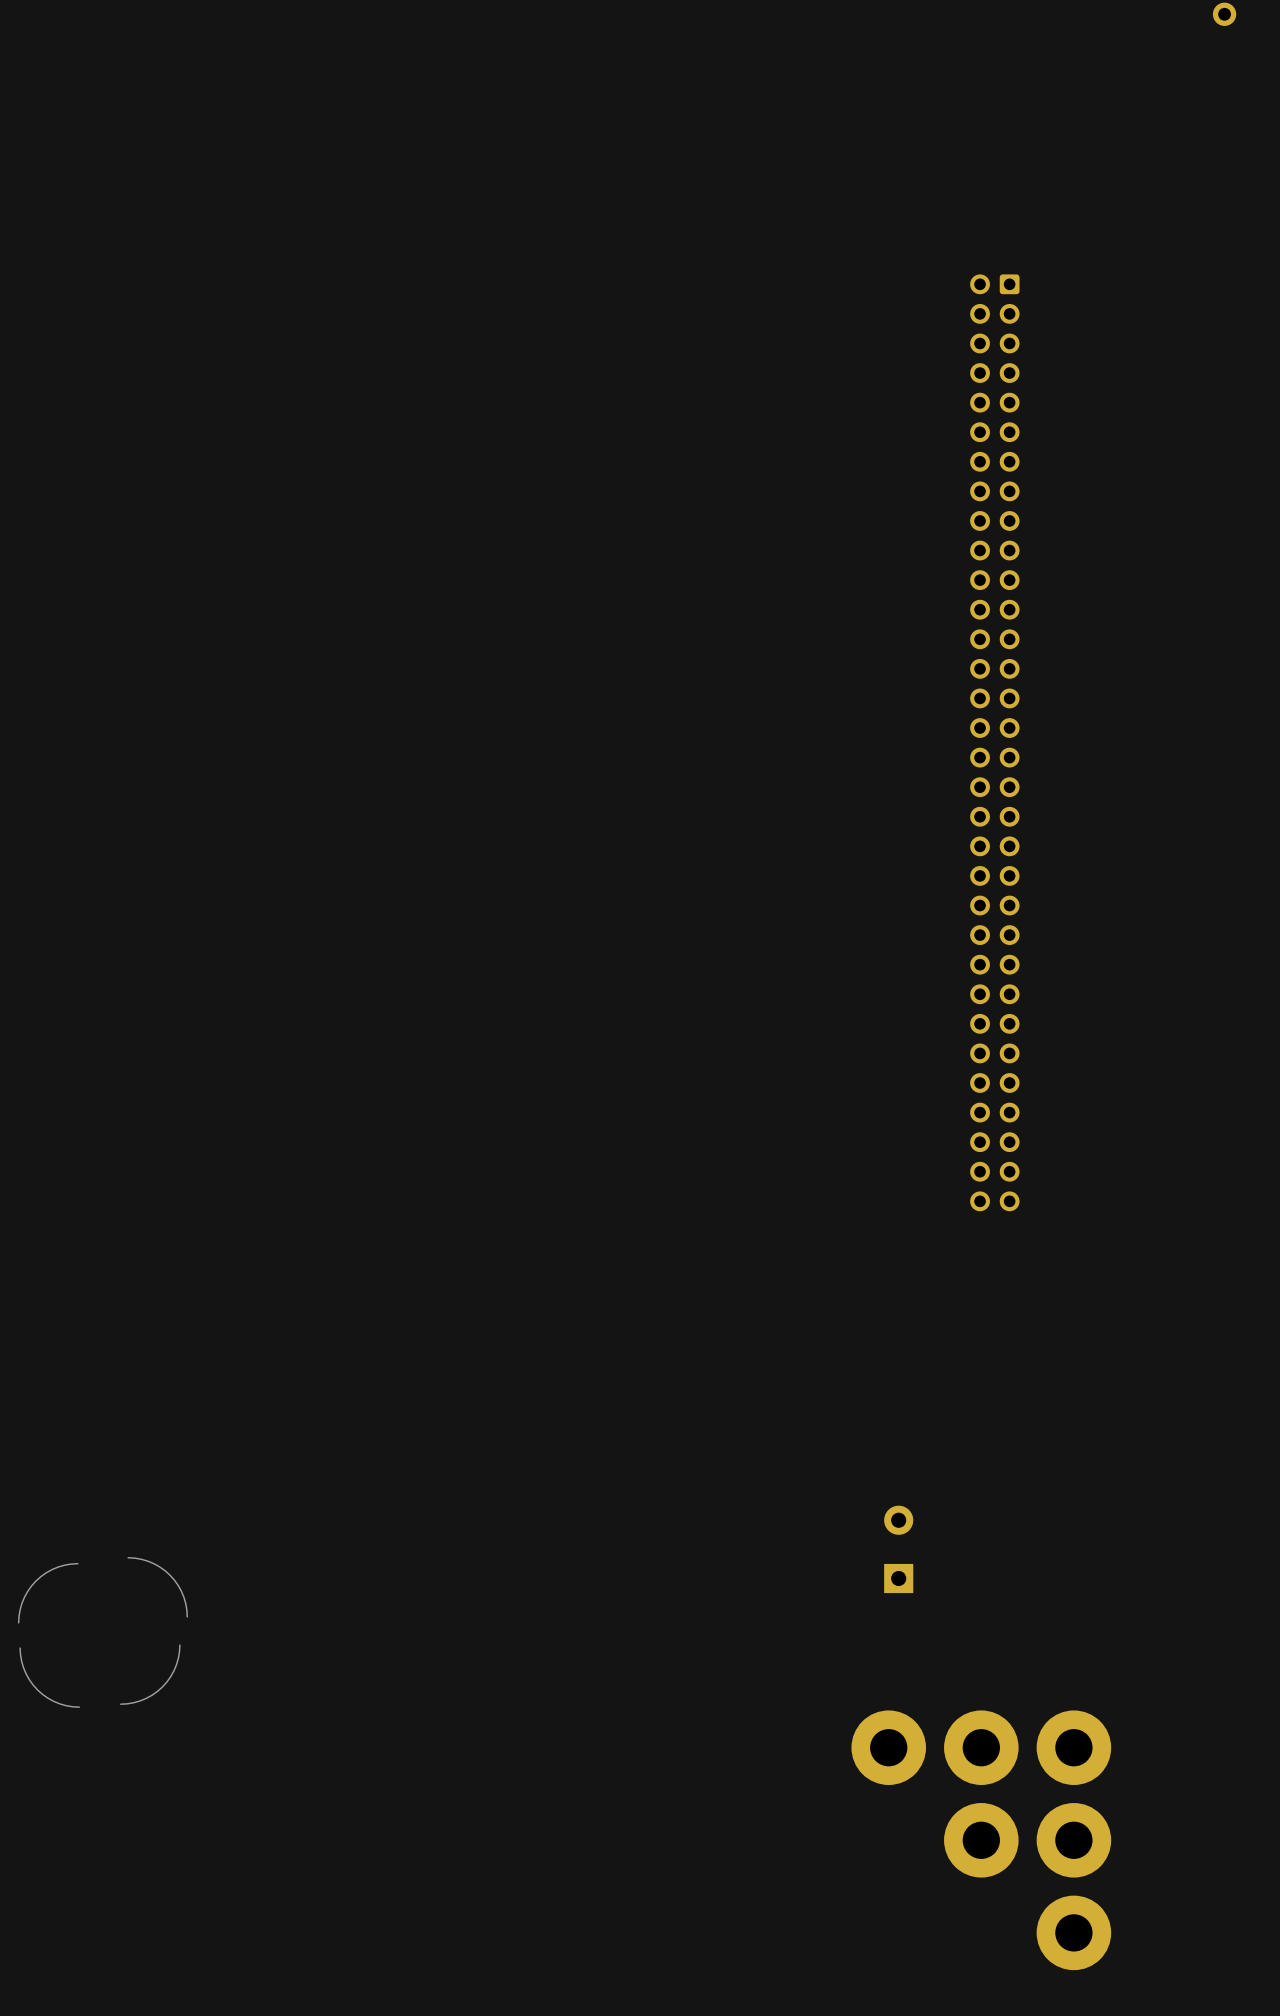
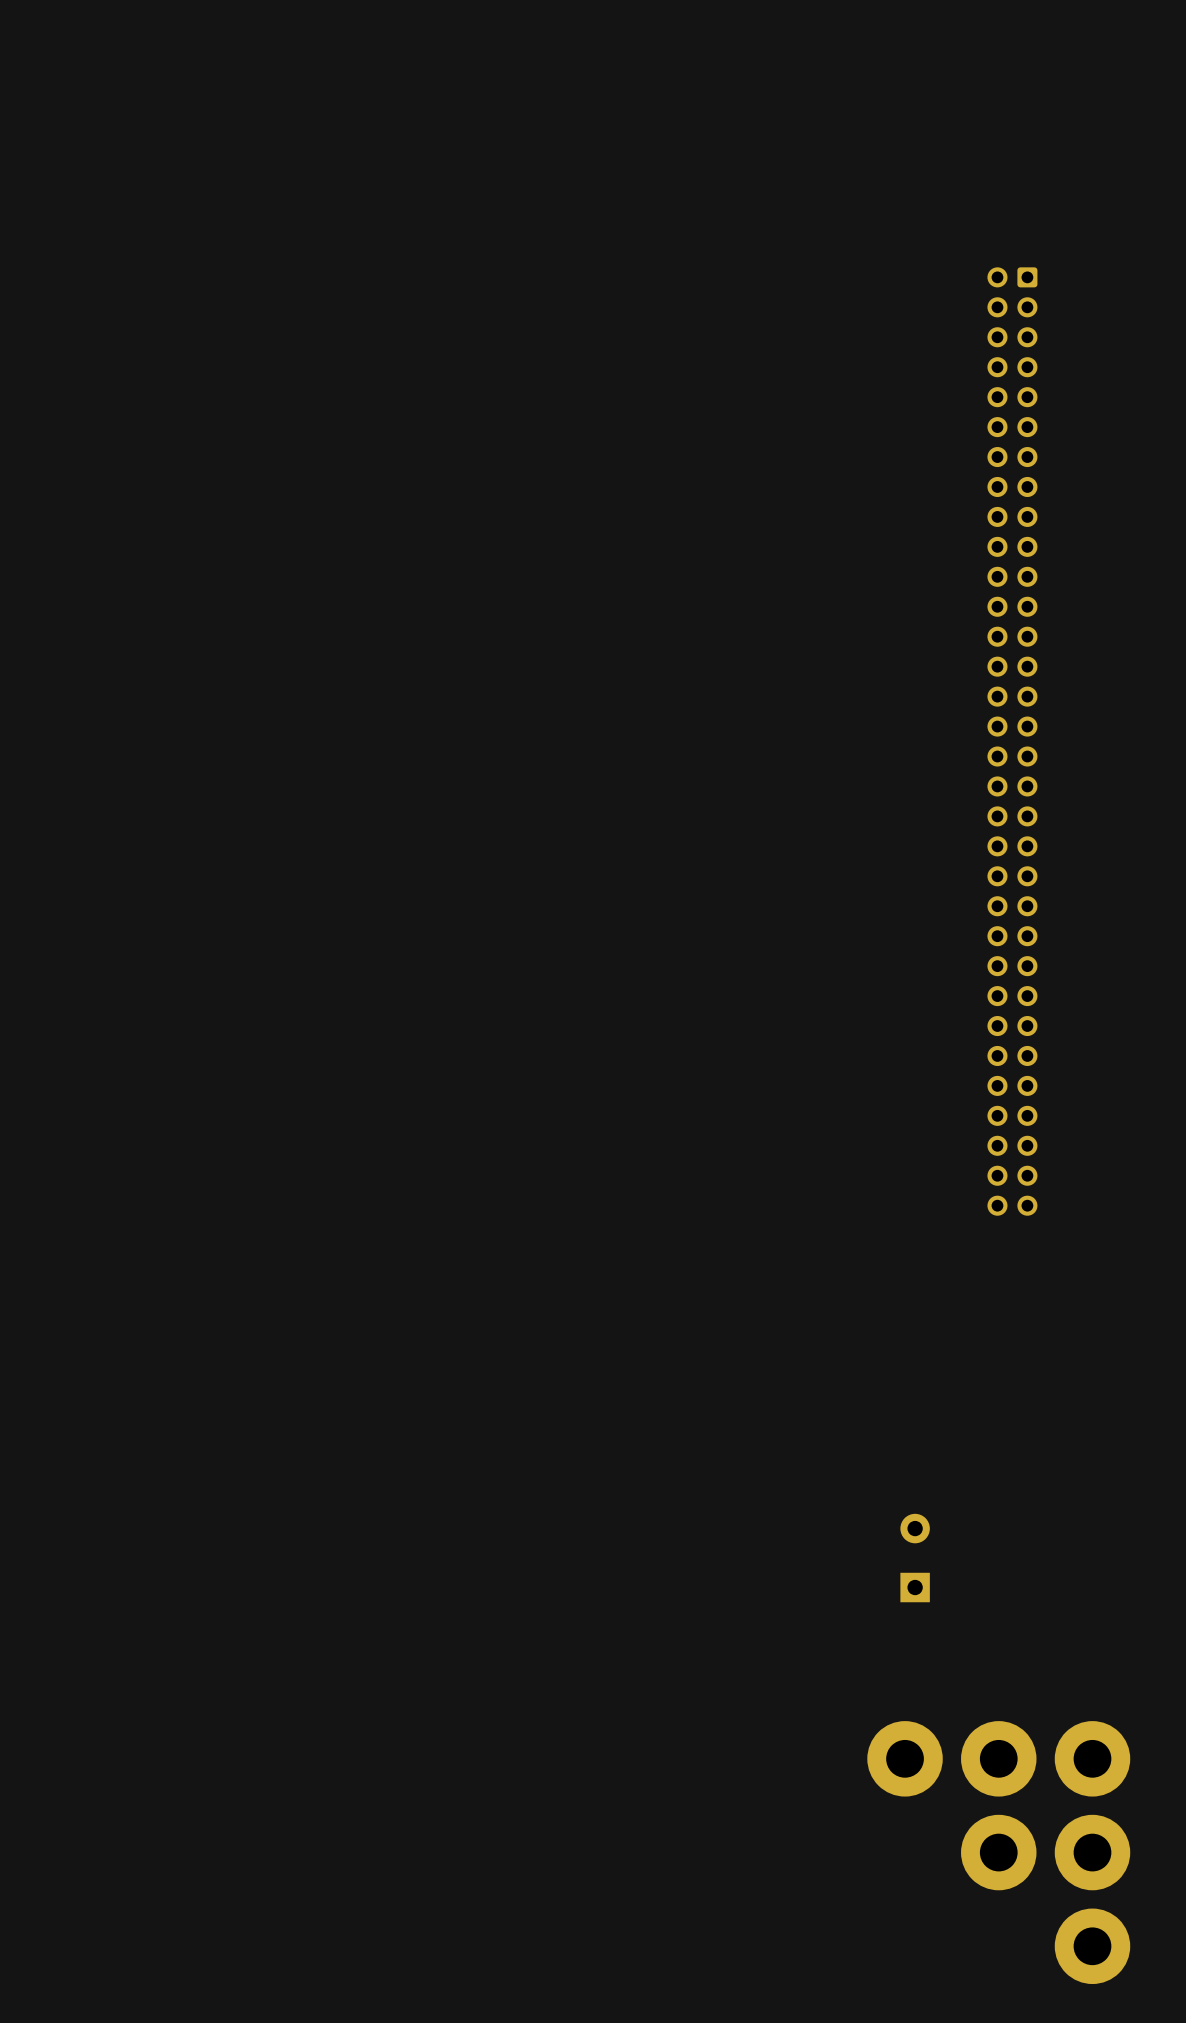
board edge: (128, 1557) (147, 1561) (169, 1575) (183, 1597) (187, 1616) -> none
board edge: (77, 1563) (58, 1567) (35, 1581) (24, 1597) (18, 1622) -> none
board edge: (179, 1645) (174, 1670) (162, 1686) (140, 1700) (120, 1704) -> none
board edge: (20, 1648) (25, 1673) (37, 1689) (59, 1703) (79, 1707) -> none

